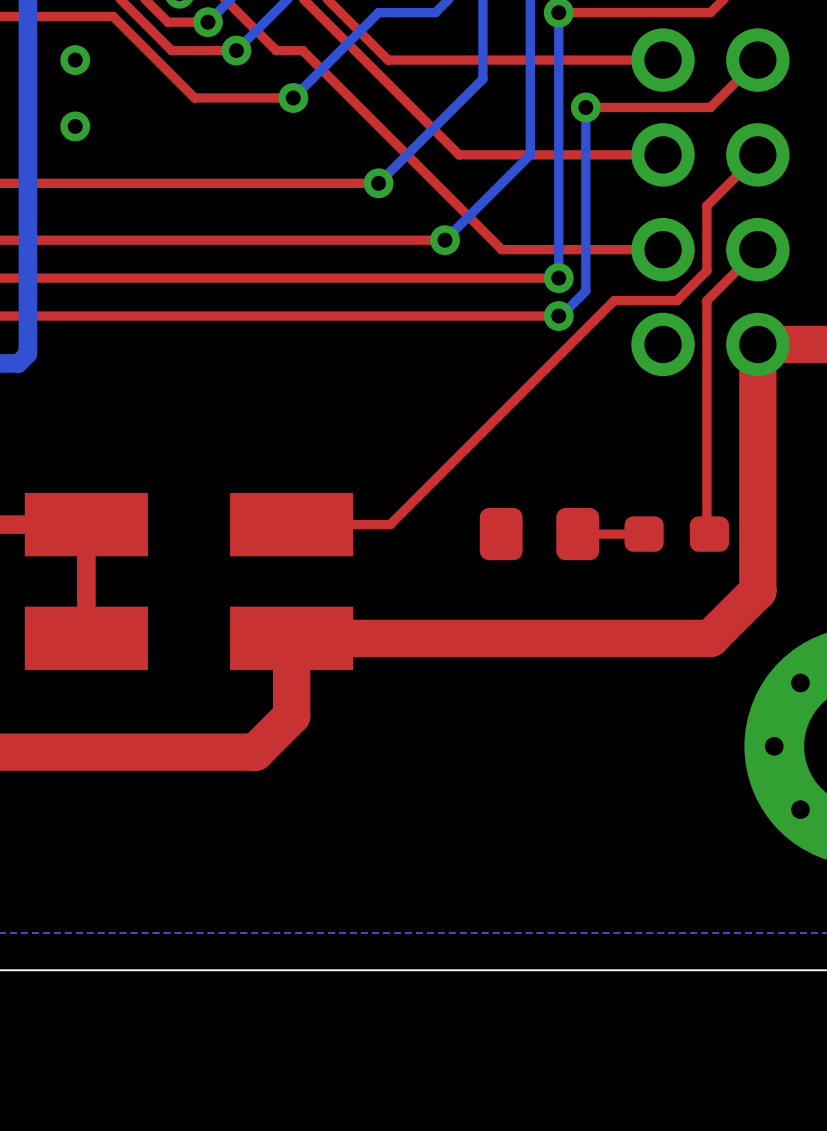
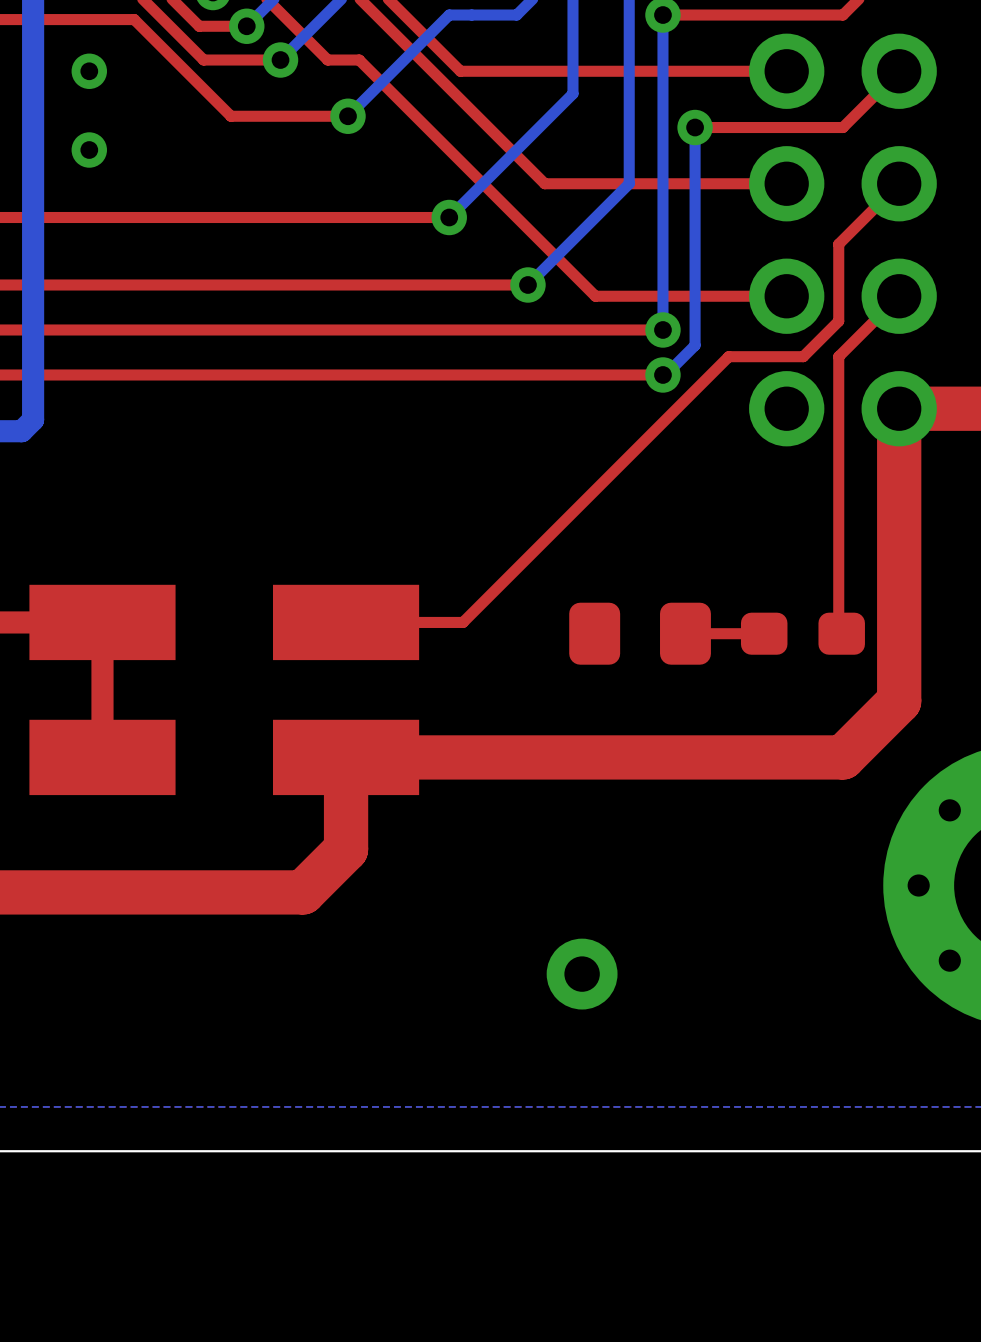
via: none -> (582, 974)

